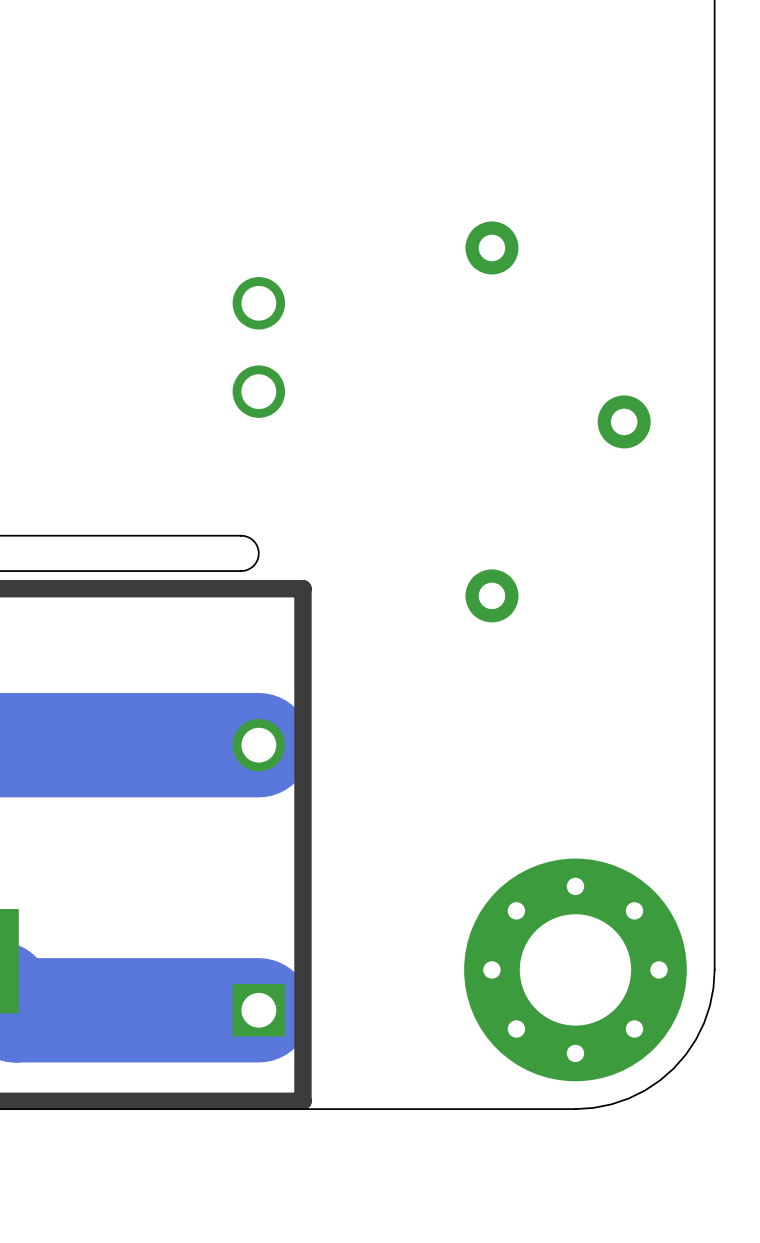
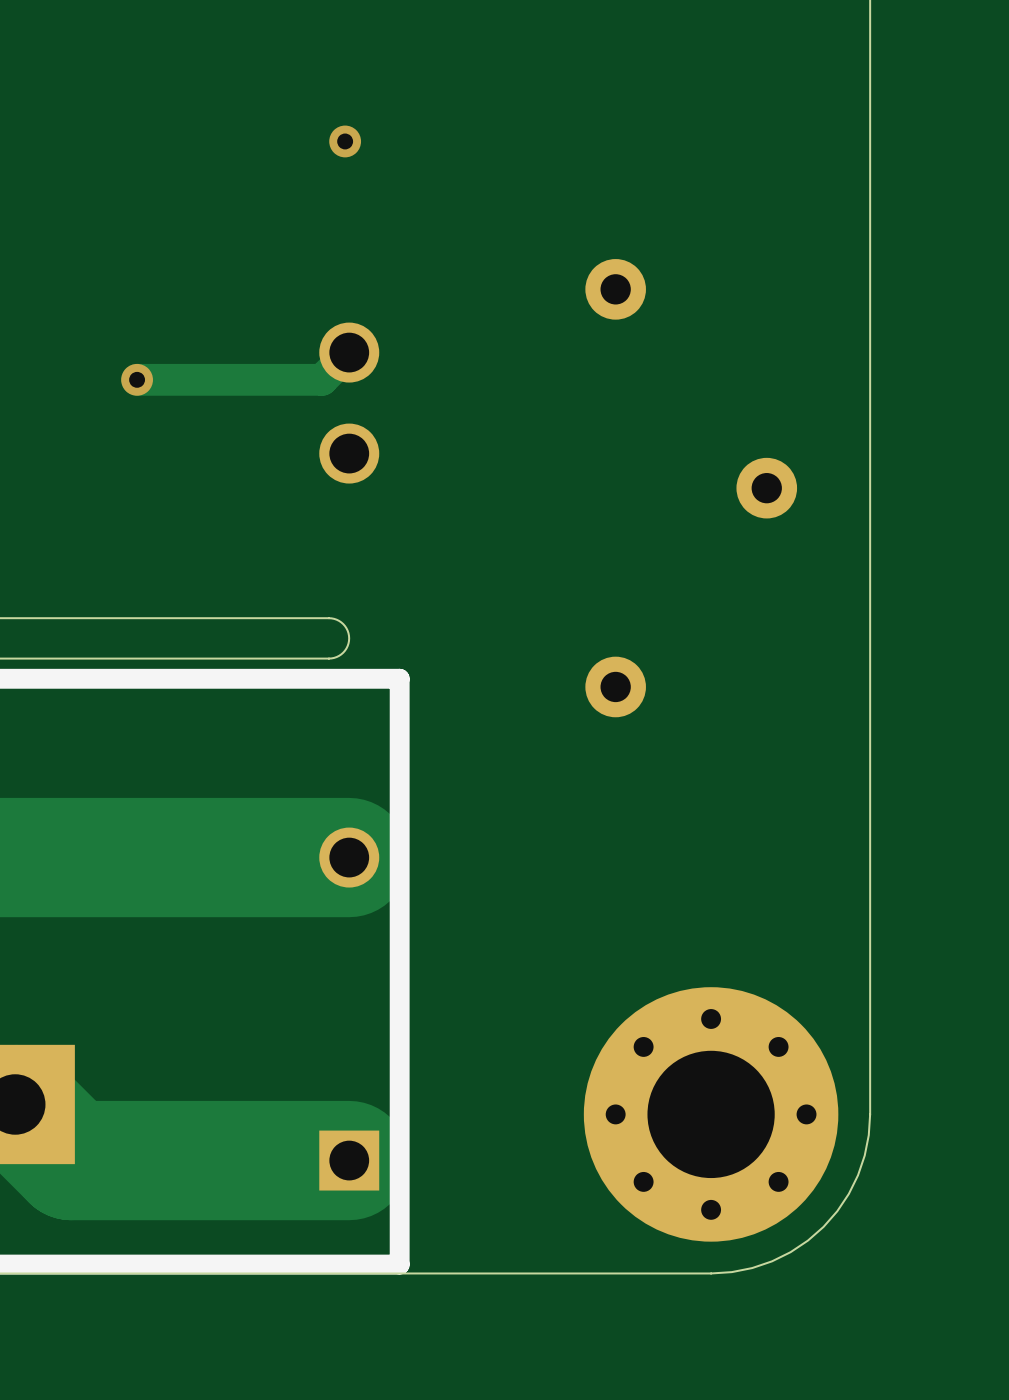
via: none -> (345, 141)
track: none -> (349, 352) (321, 379) (137, 379)
via: none -> (137, 379)

